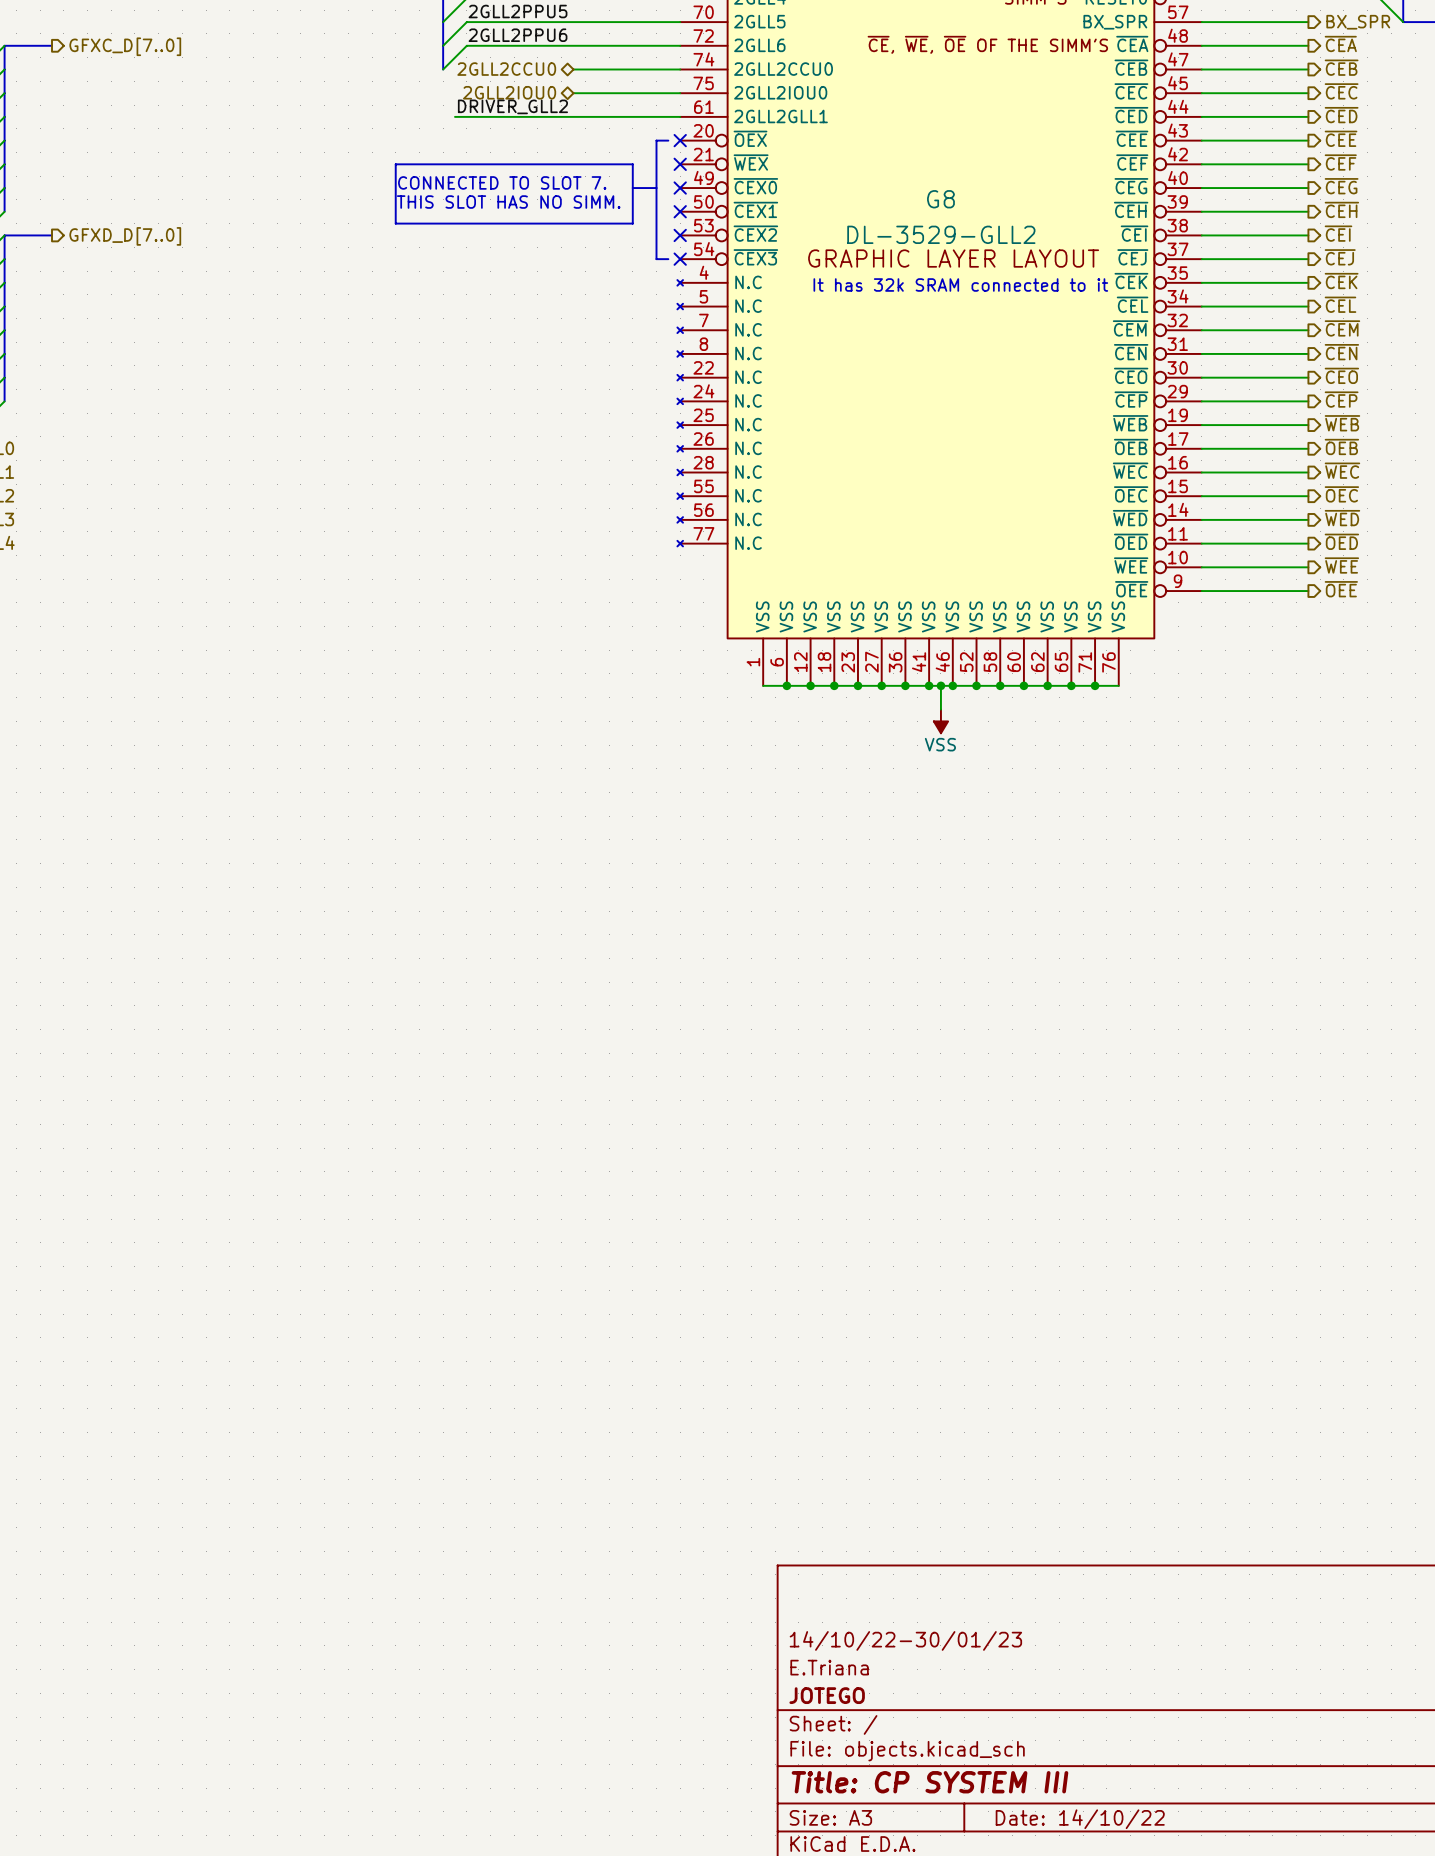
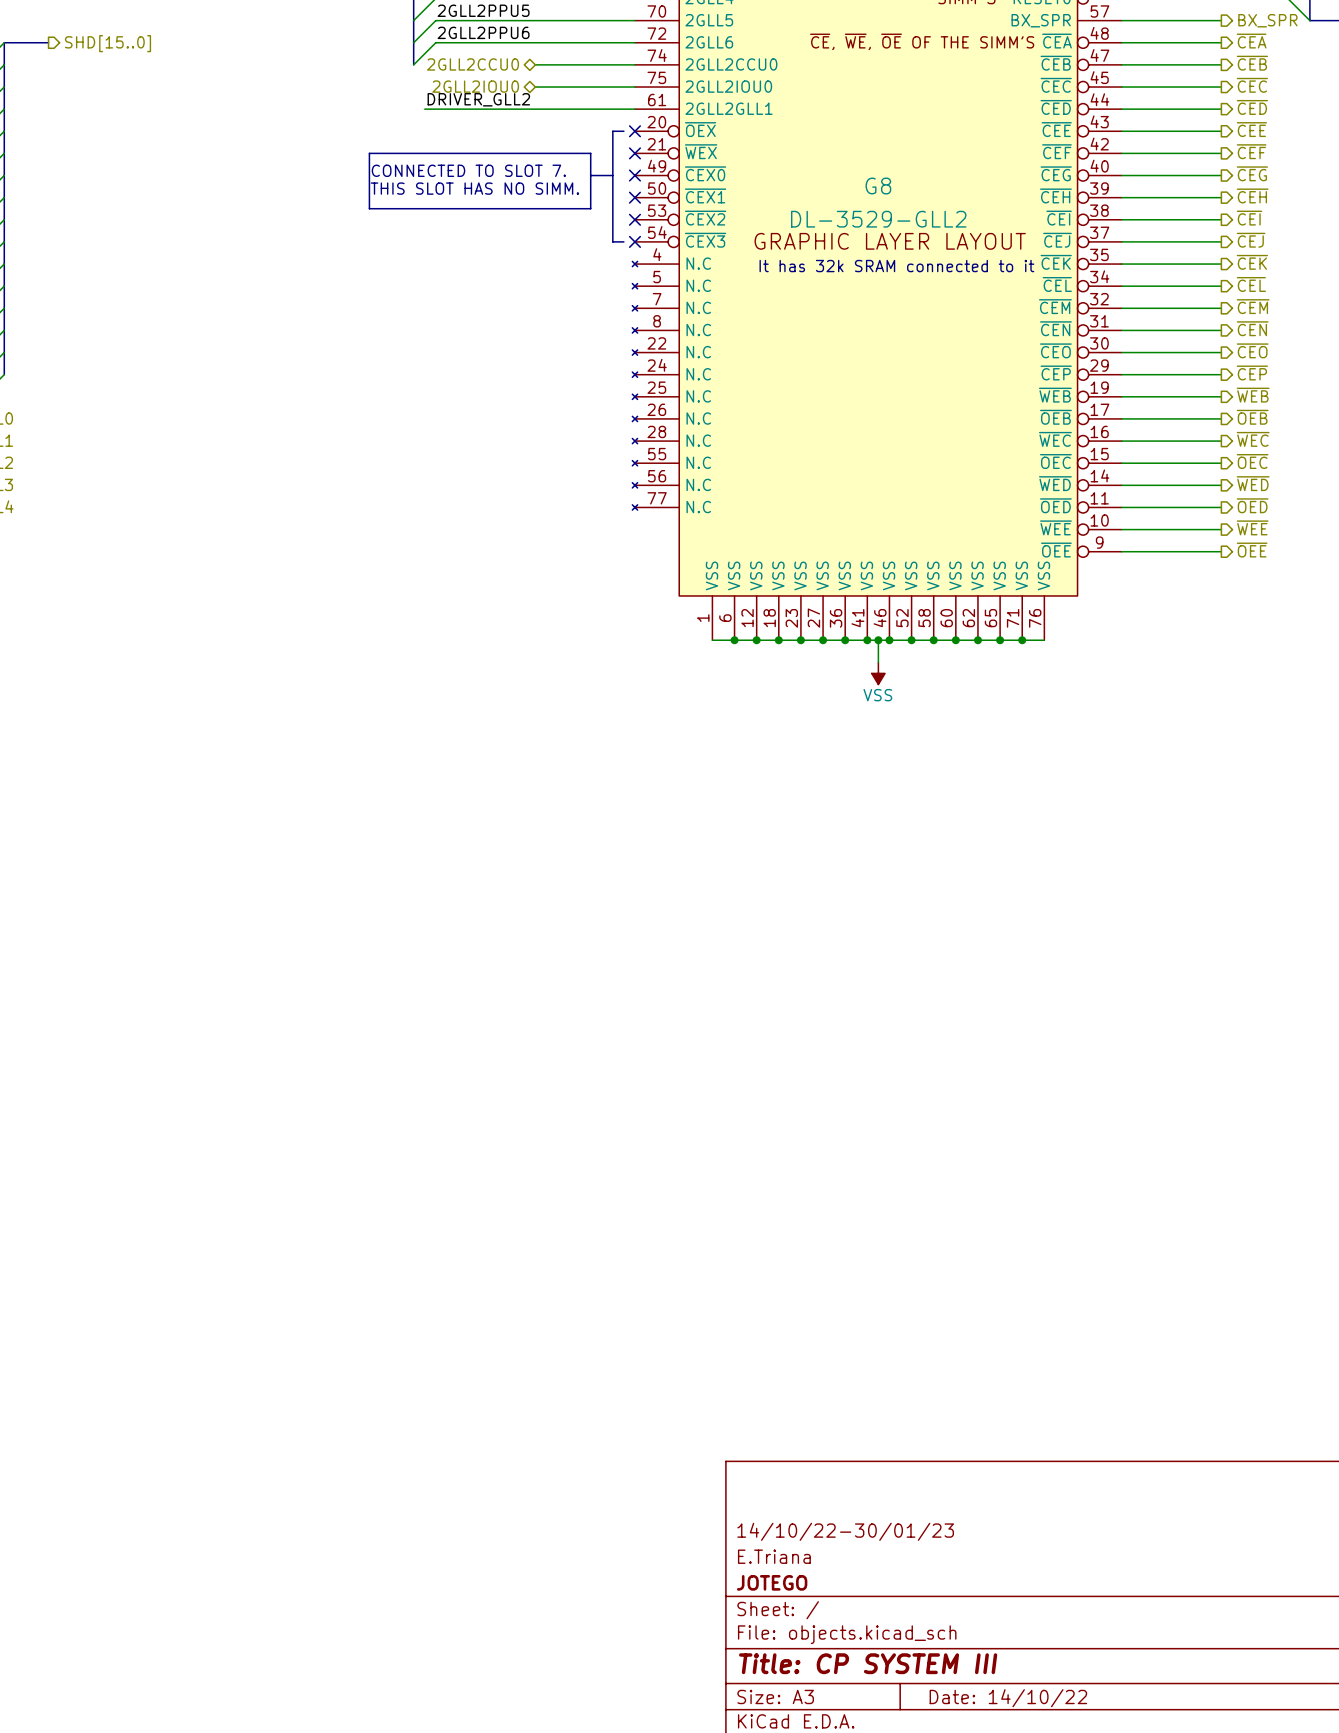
hierarchical label: GFXC_D[7..0] (125, 46) -> SHD[15..0] (107, 43)
bus: (4, 235) (52, 235) -> (4, 219) (4, 197)
hierarchical label: GFXD_D[7..0] (125, 236) -> none

